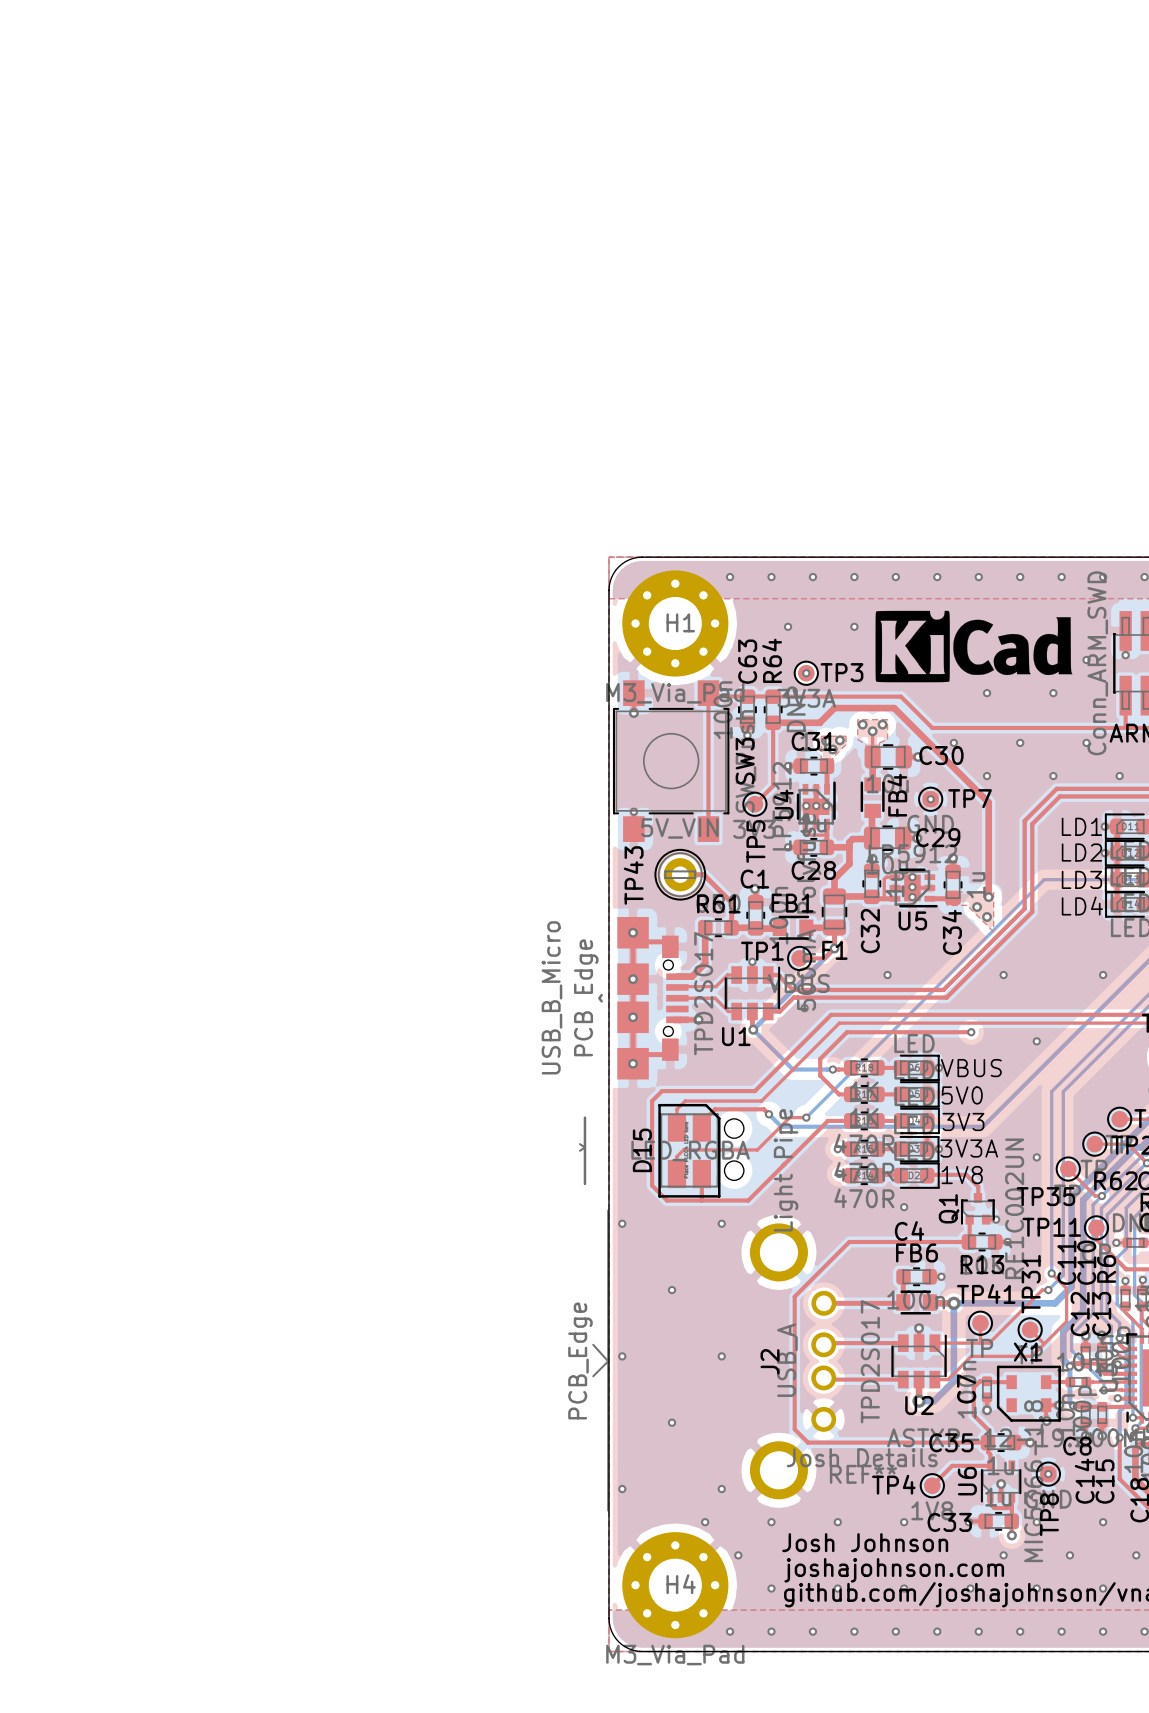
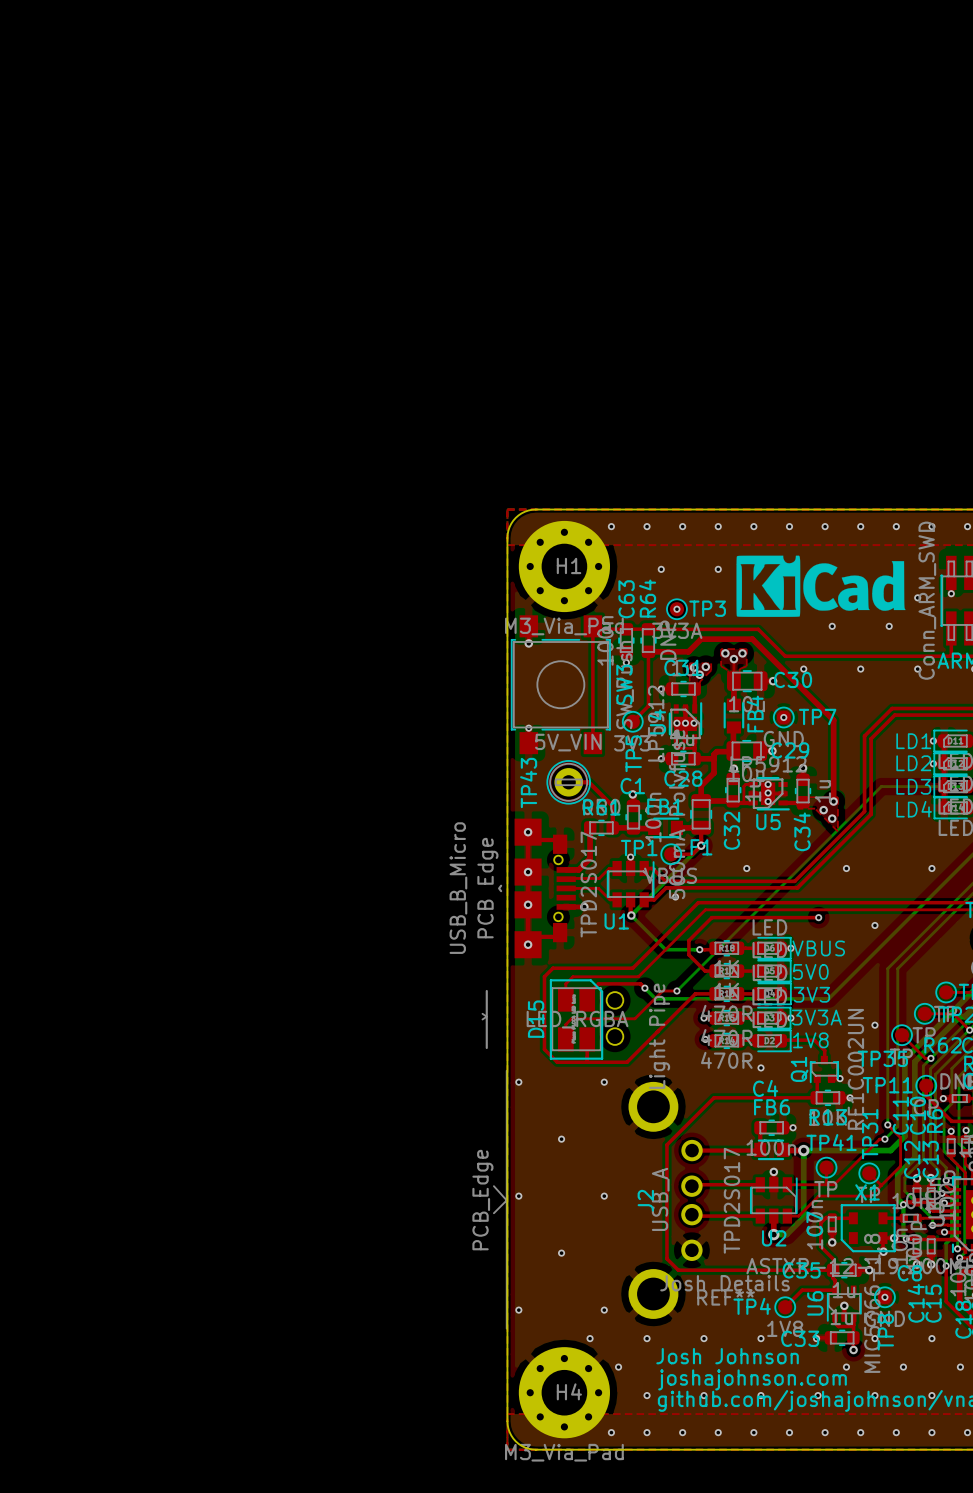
via: (987, 776) -> none
via: (1053, 776) -> none
via: (1119, 776) -> none

